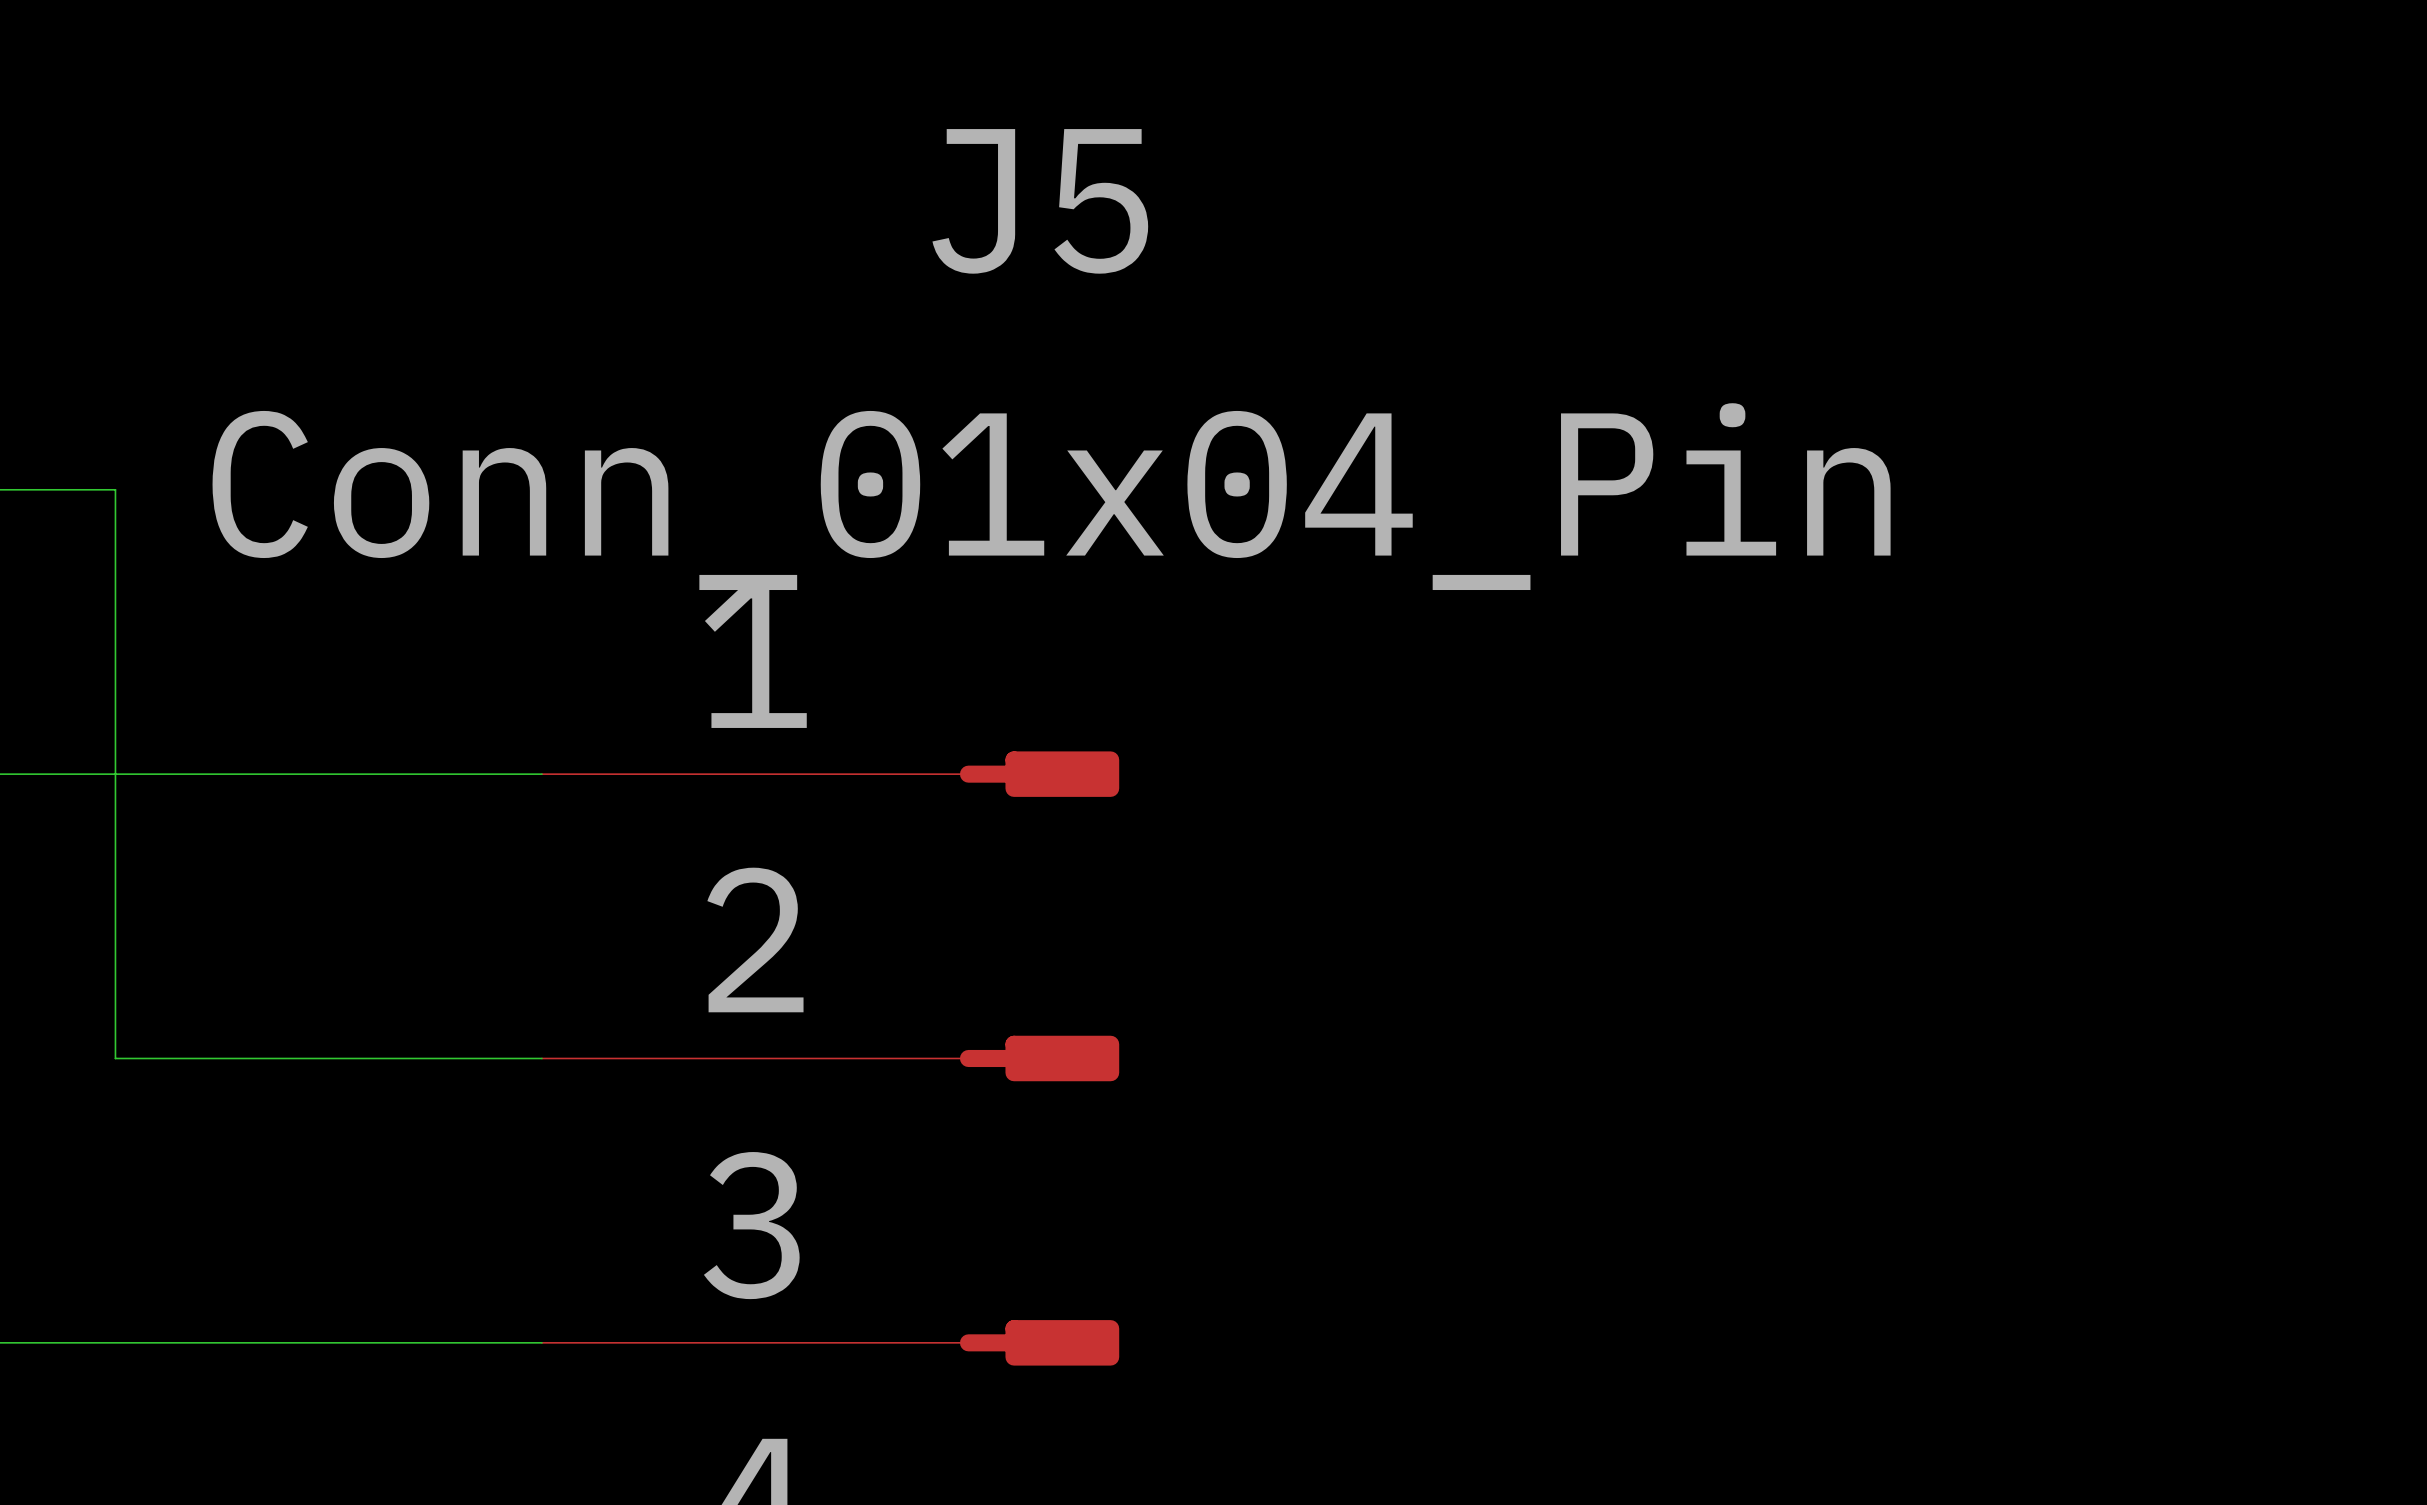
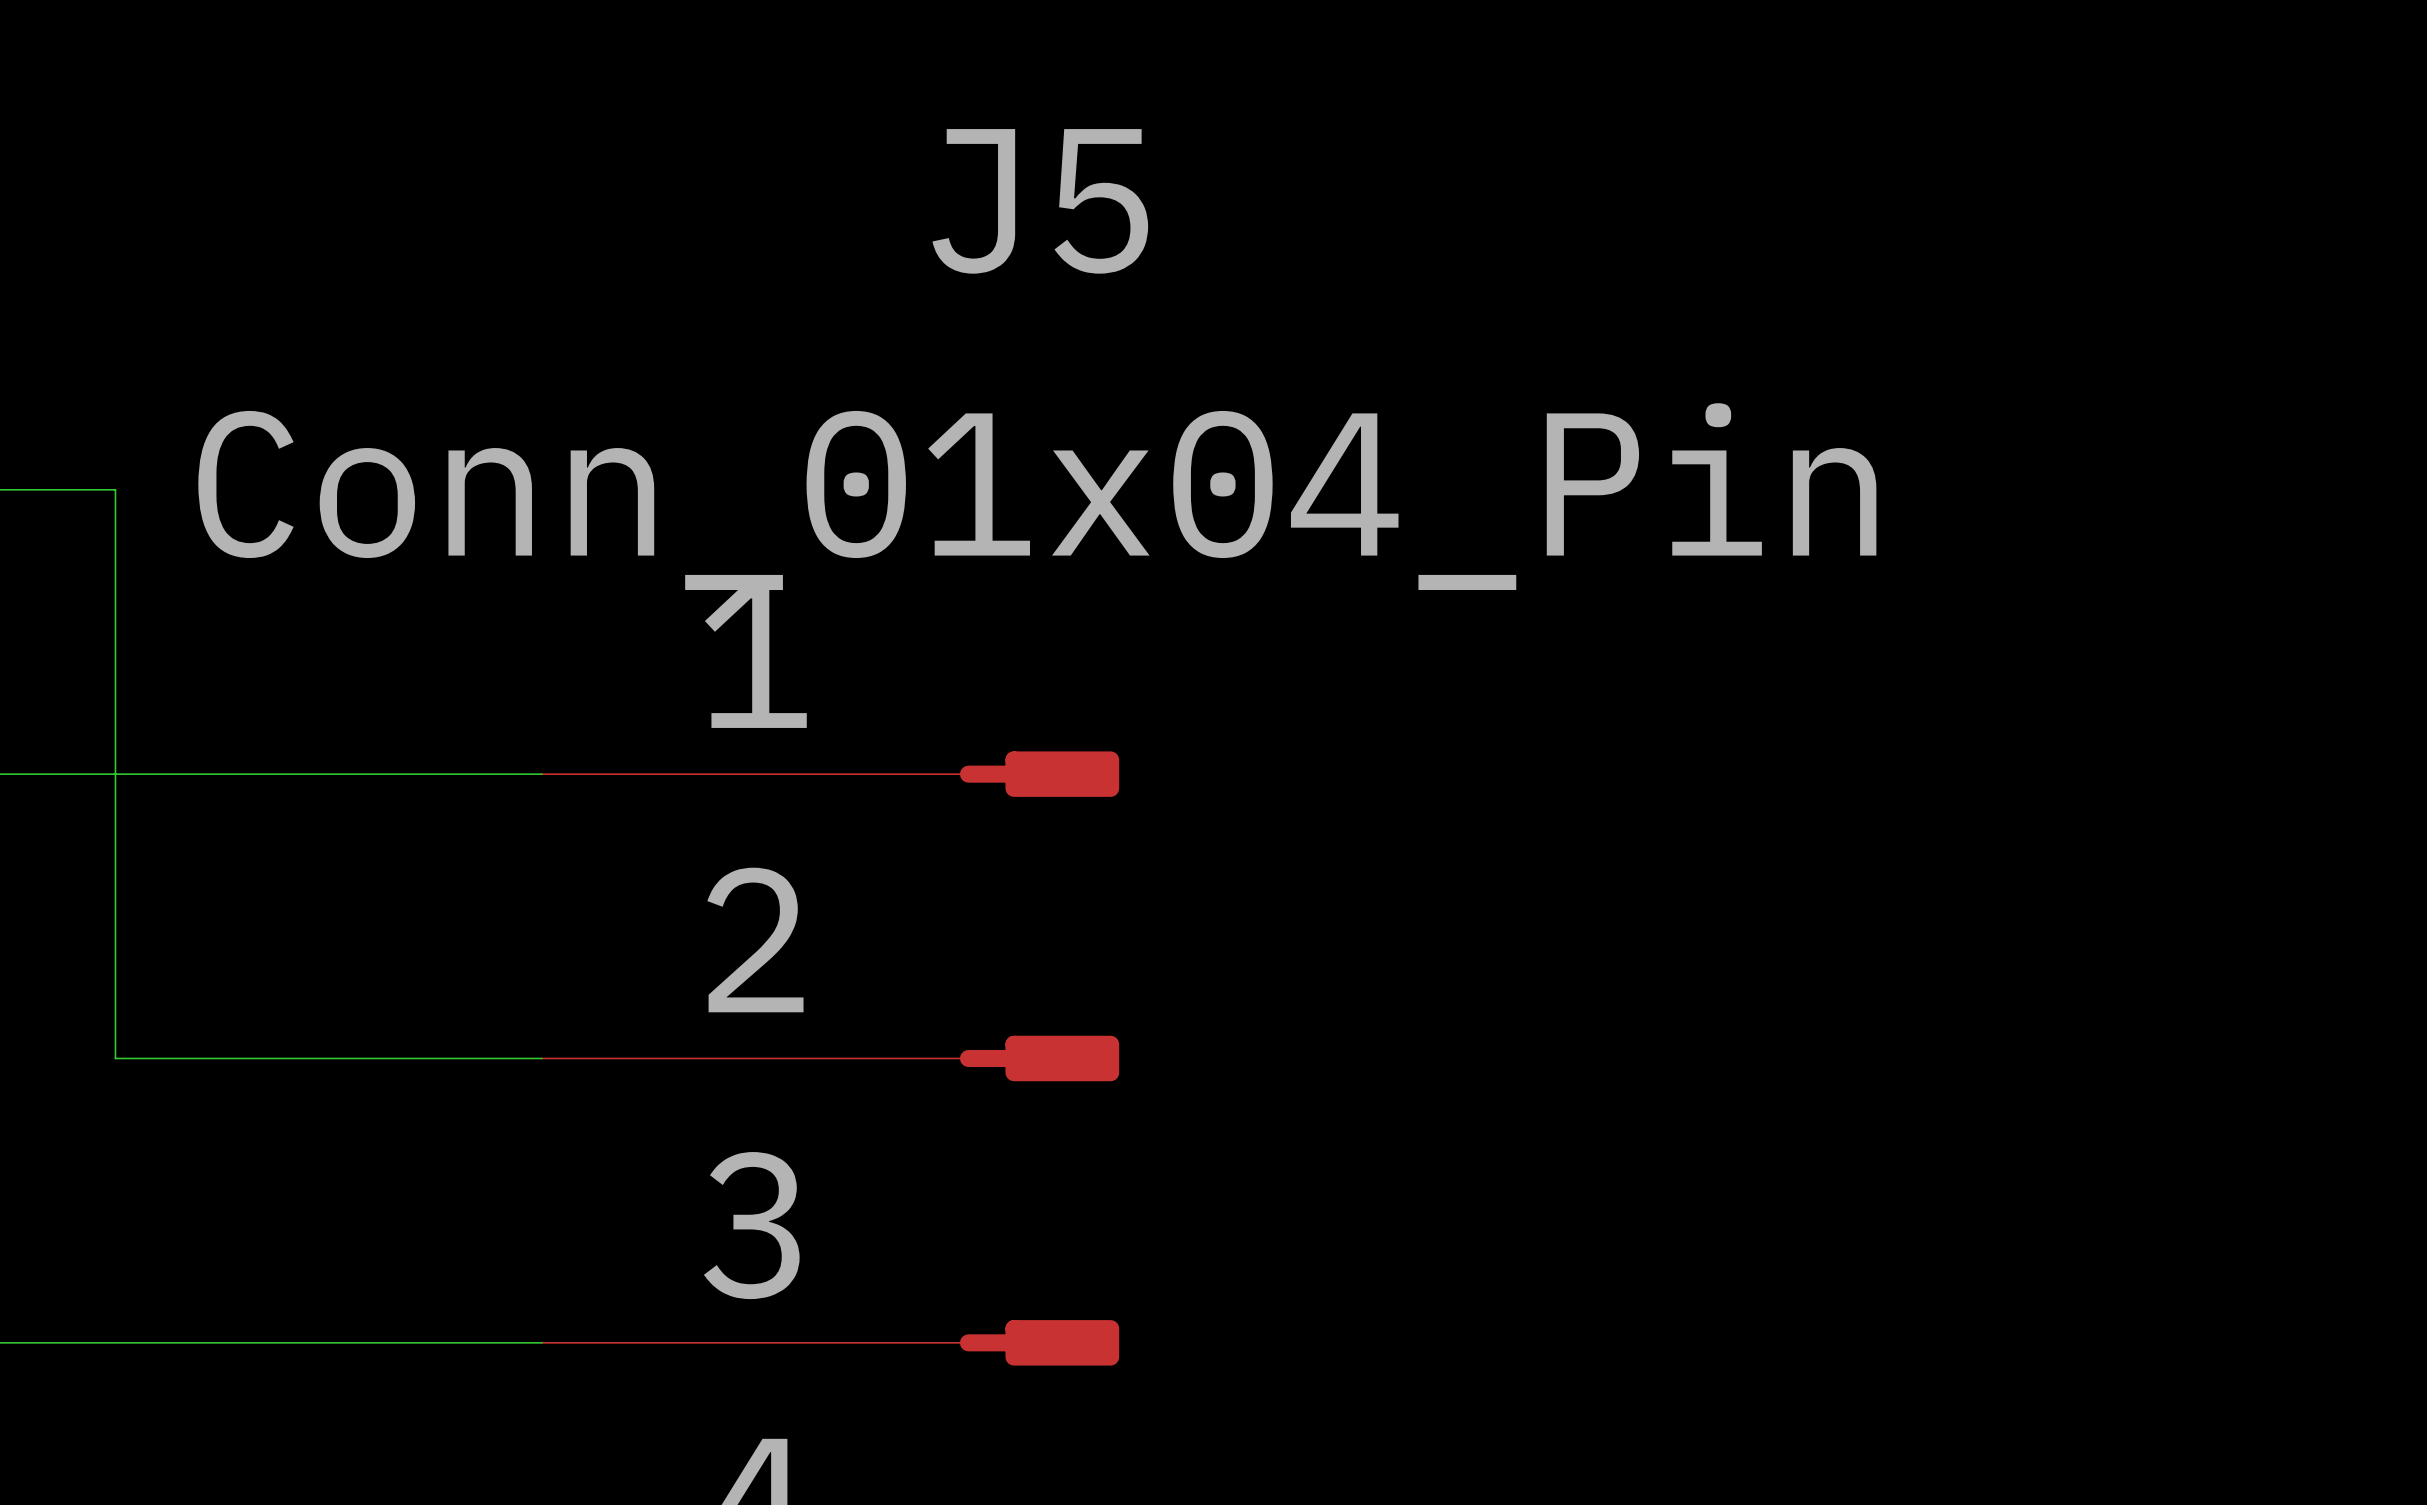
J5 value position: Conn_01x04_Pin (1051, 496) -> Conn_01x04_Pin (1037, 496)

